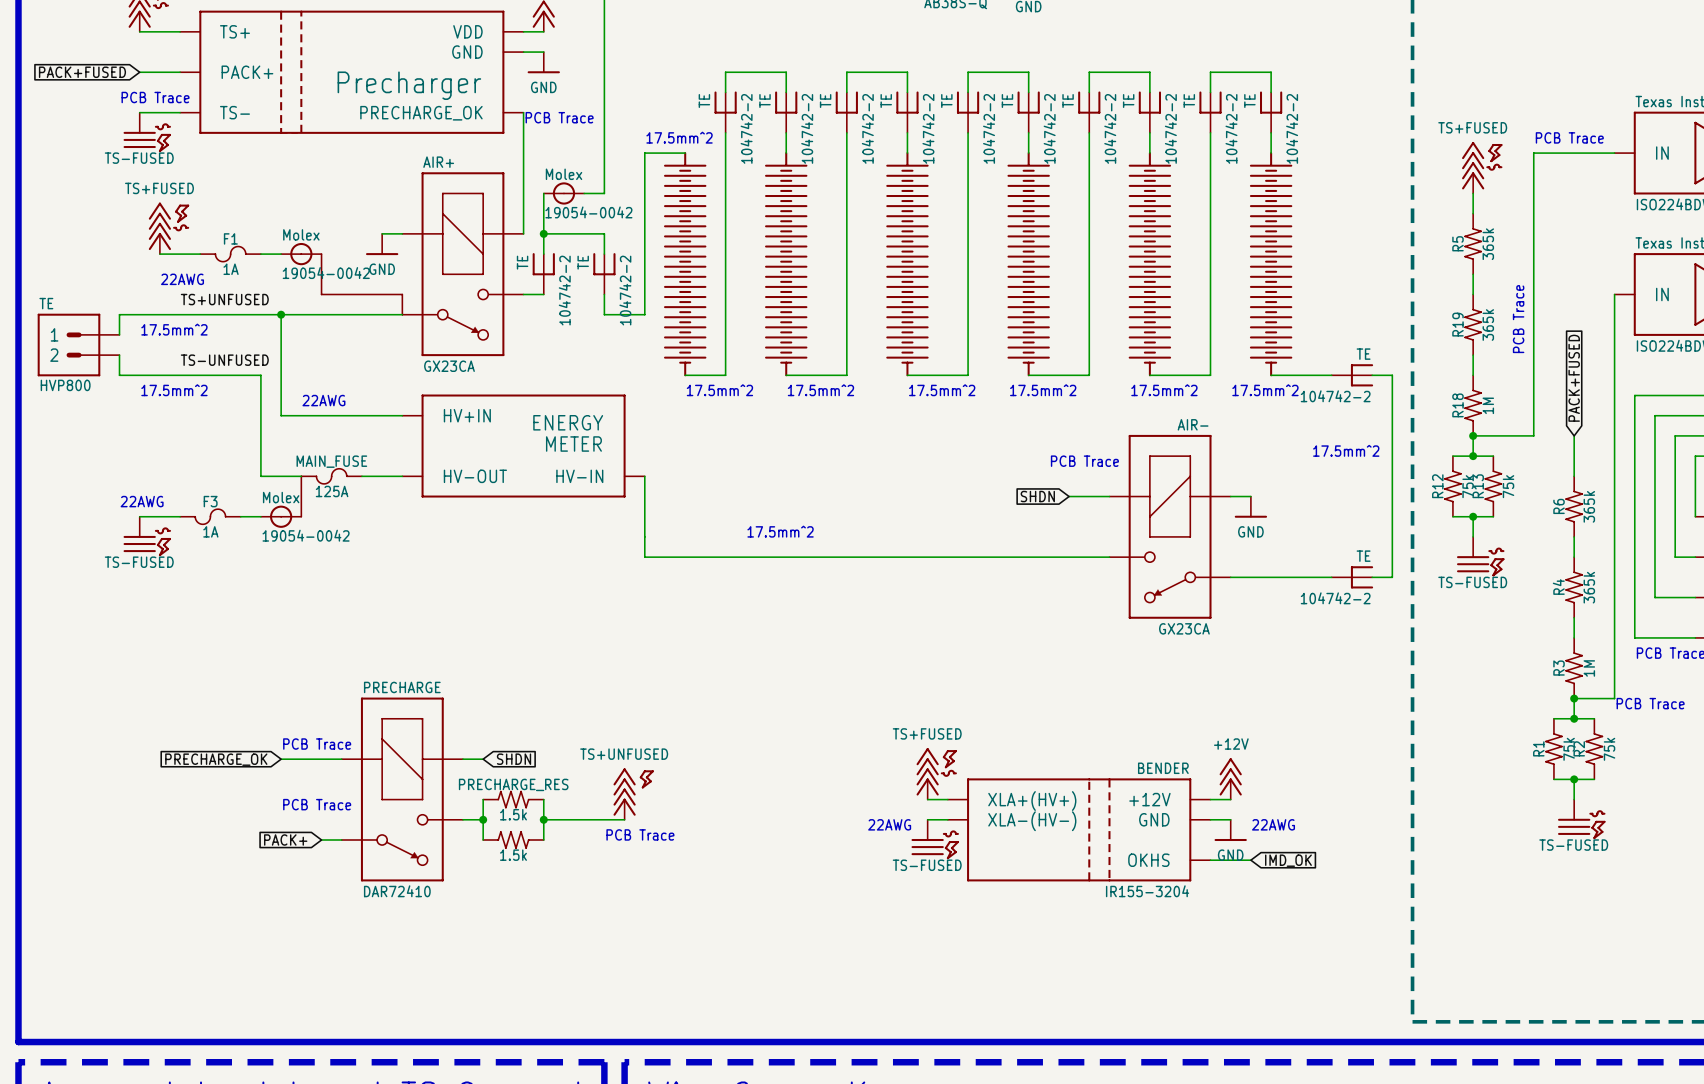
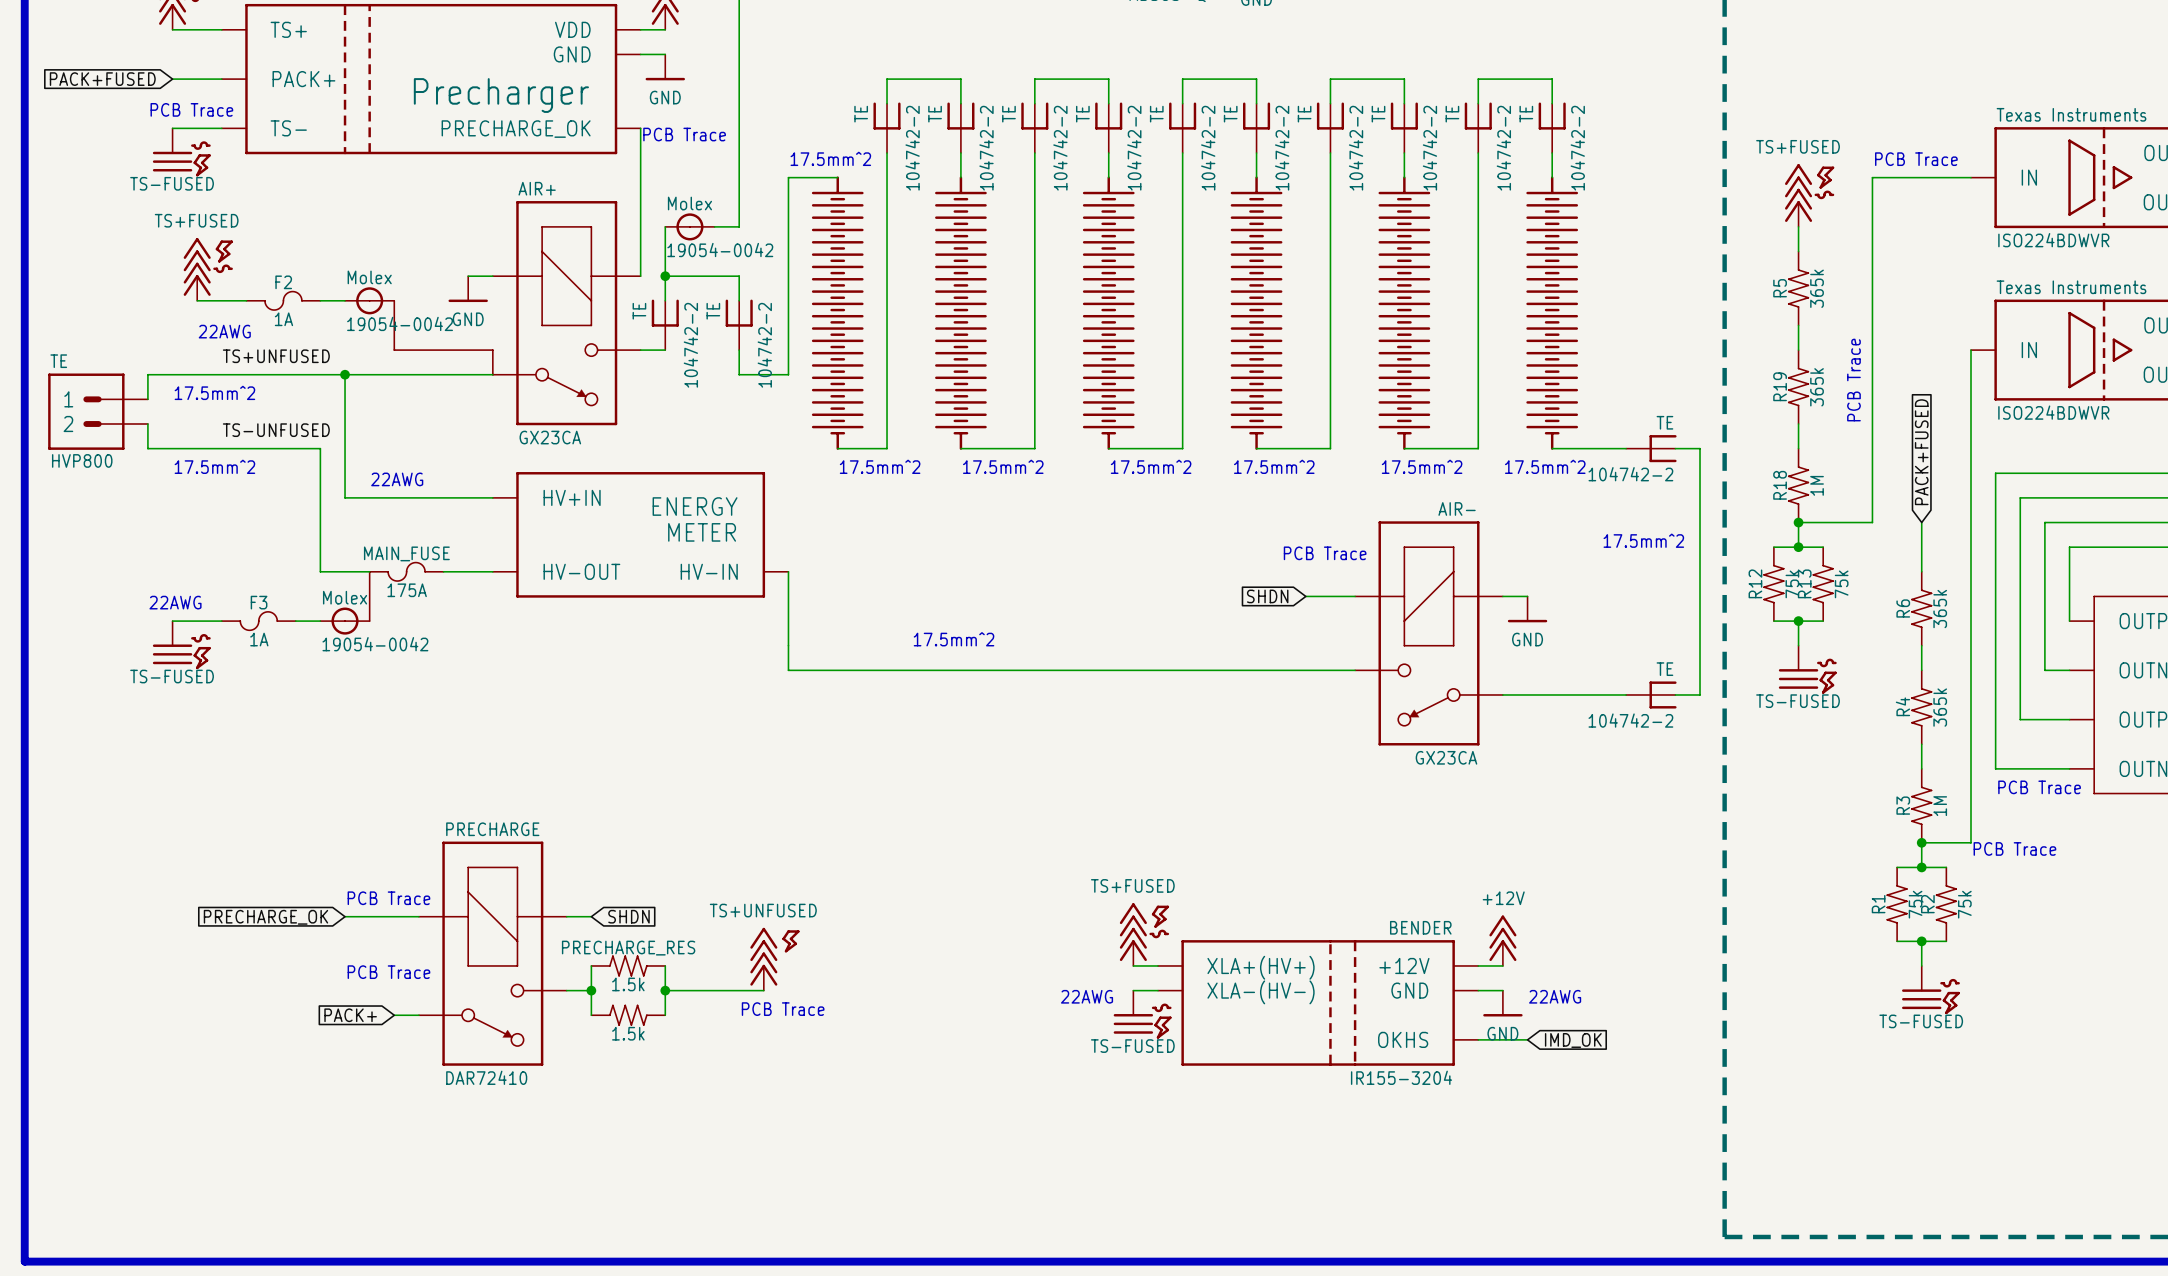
F1 name: F1 (230, 238) -> F2 (283, 282)
MAIN_FUSE value: 125A (332, 491) -> 175A (407, 590)

